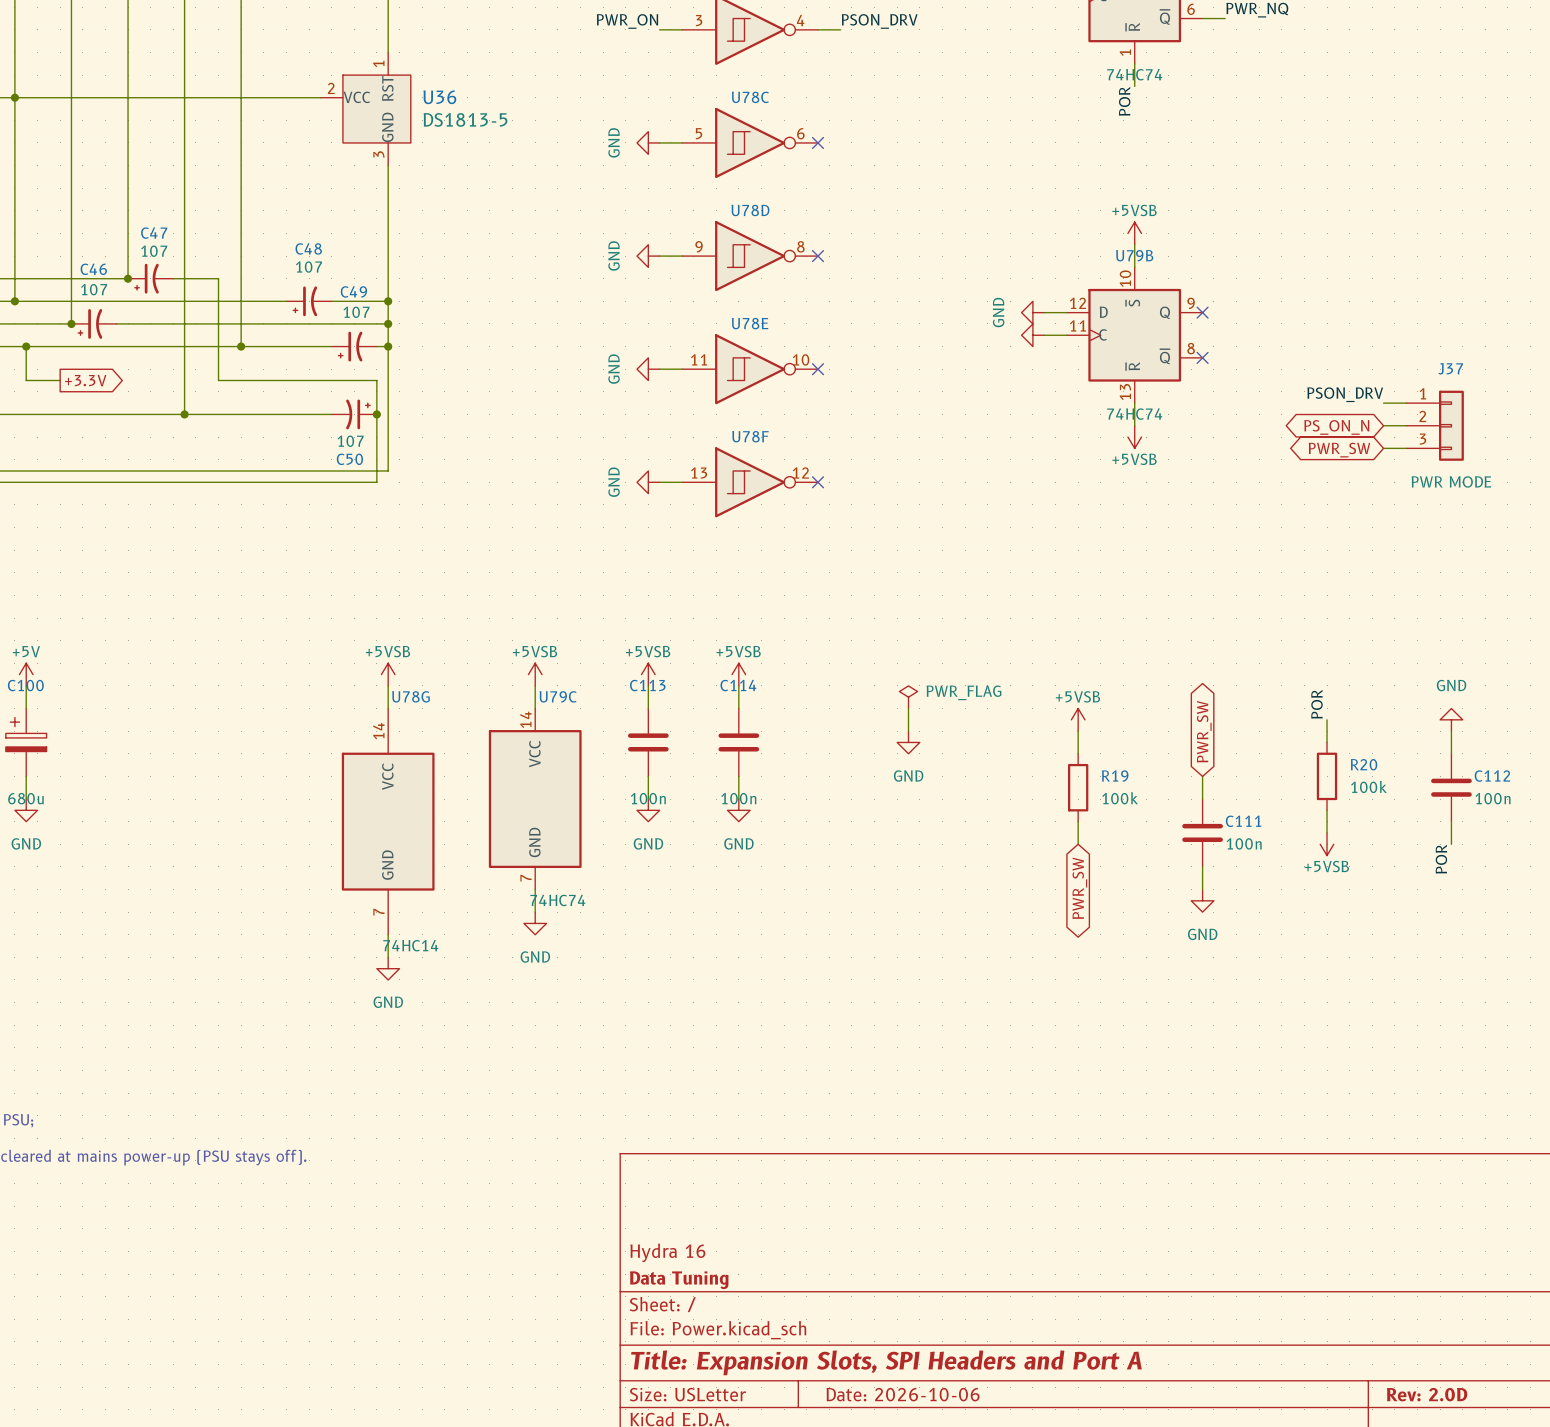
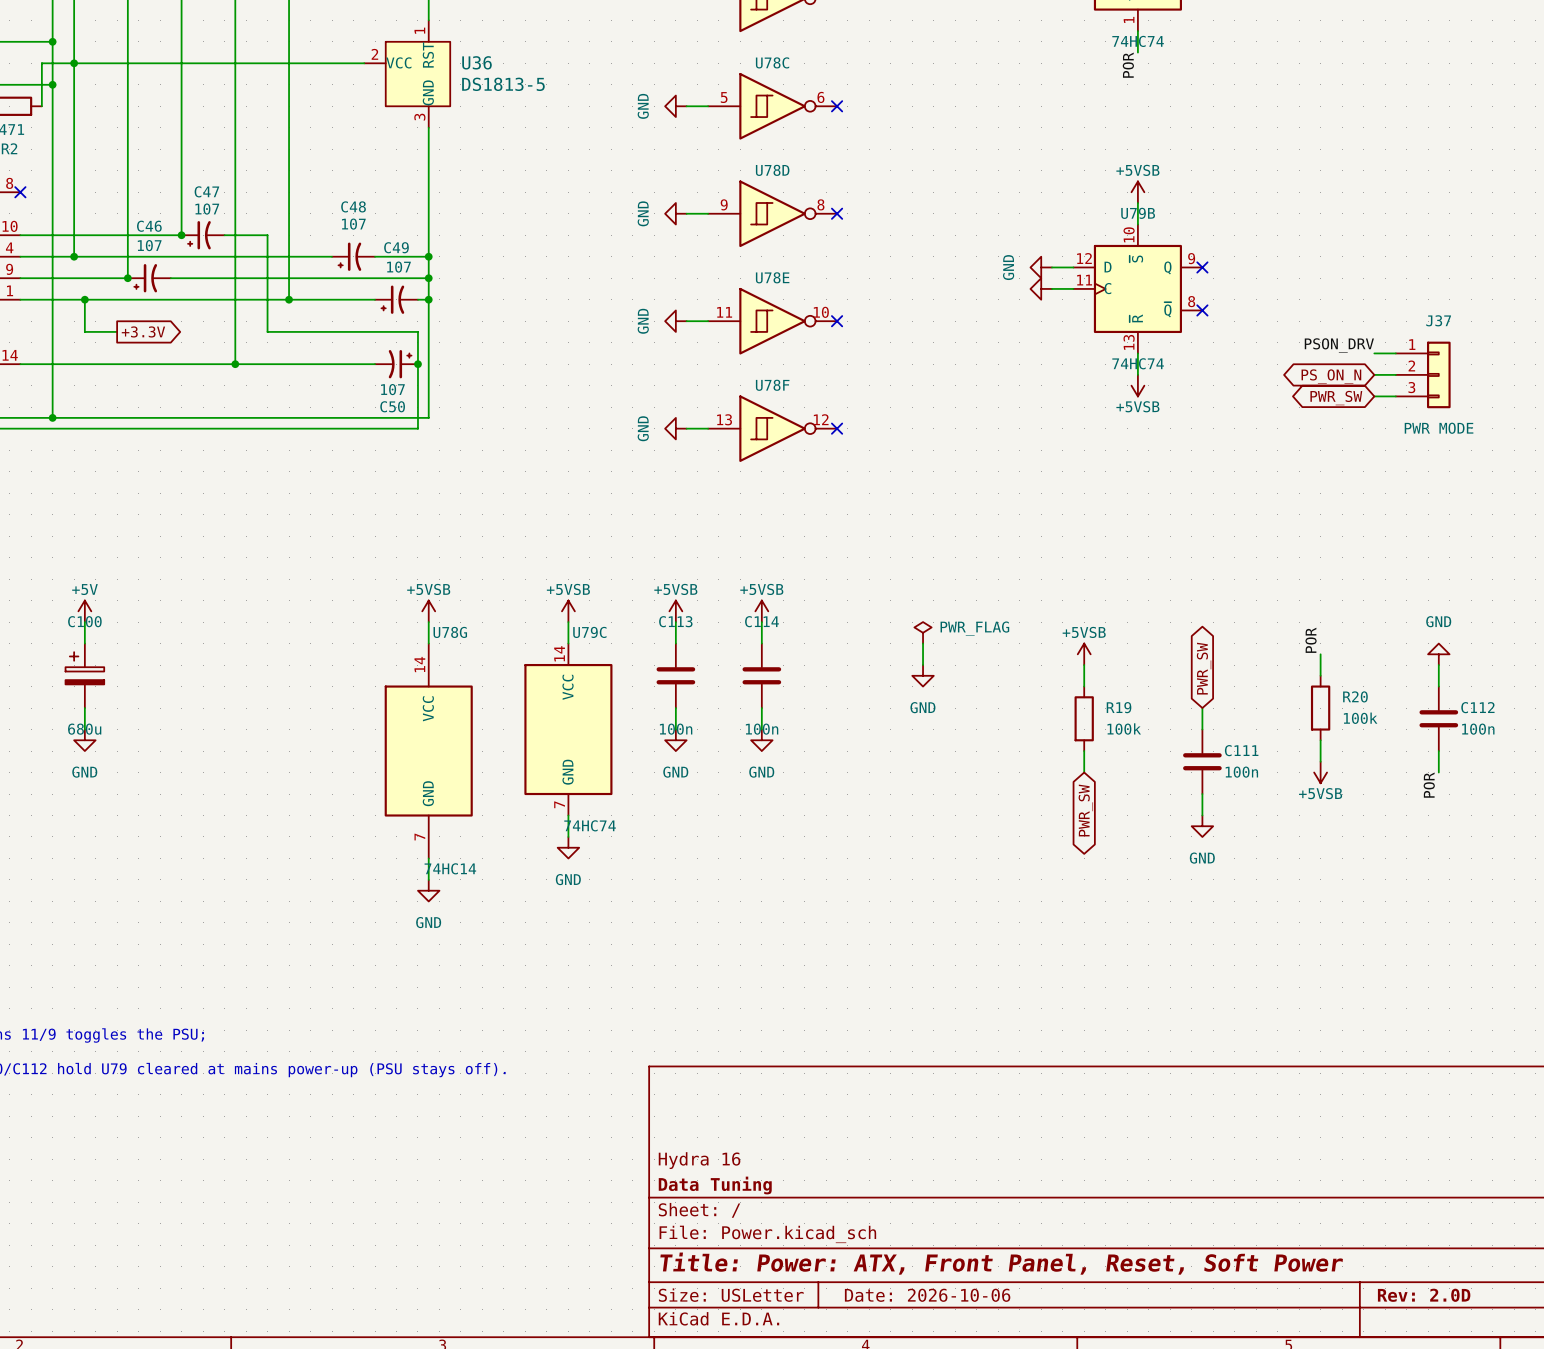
title block: Title: Expansion Slots, SPI Headers and Port A (886, 1362) -> Title: Power: ATX, Front Panel, Reset, Soft Power (1001, 1263)

